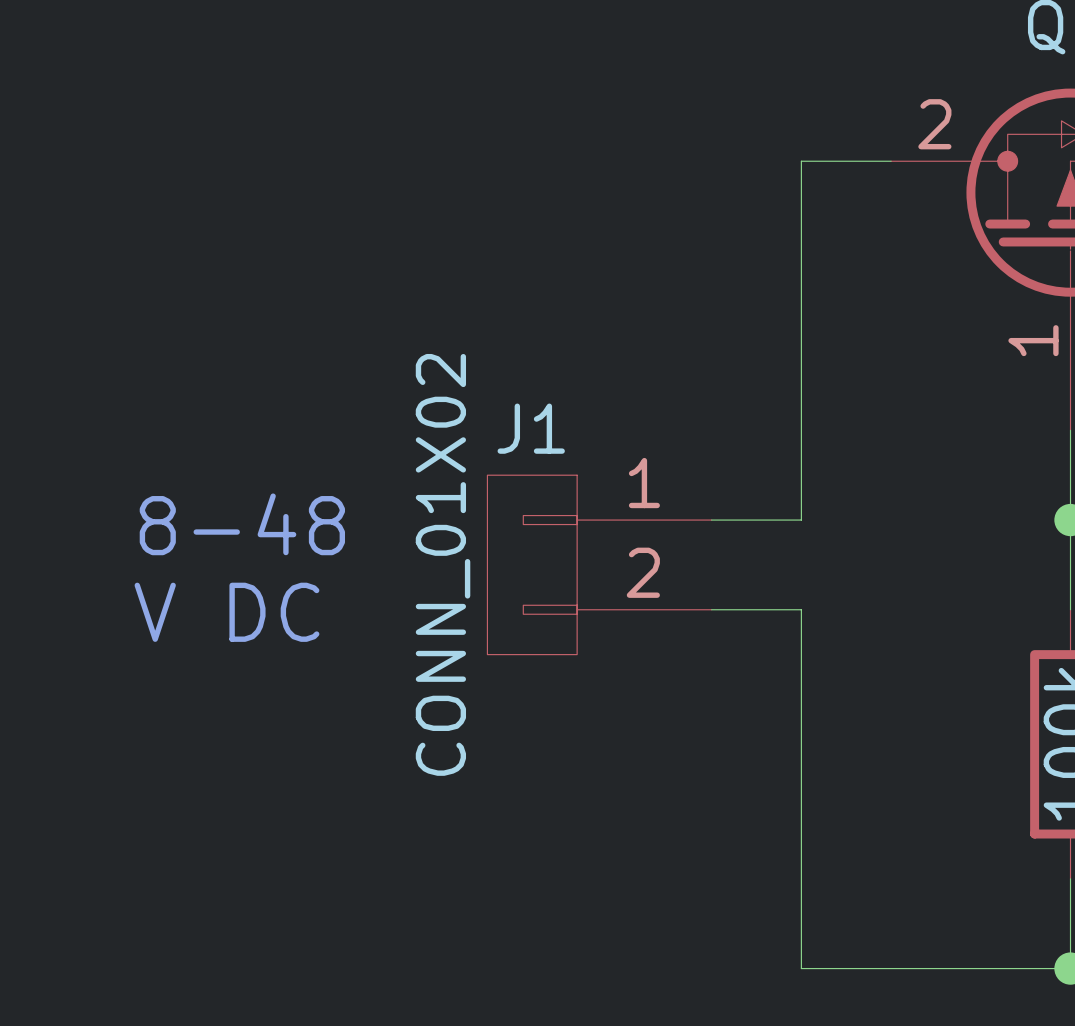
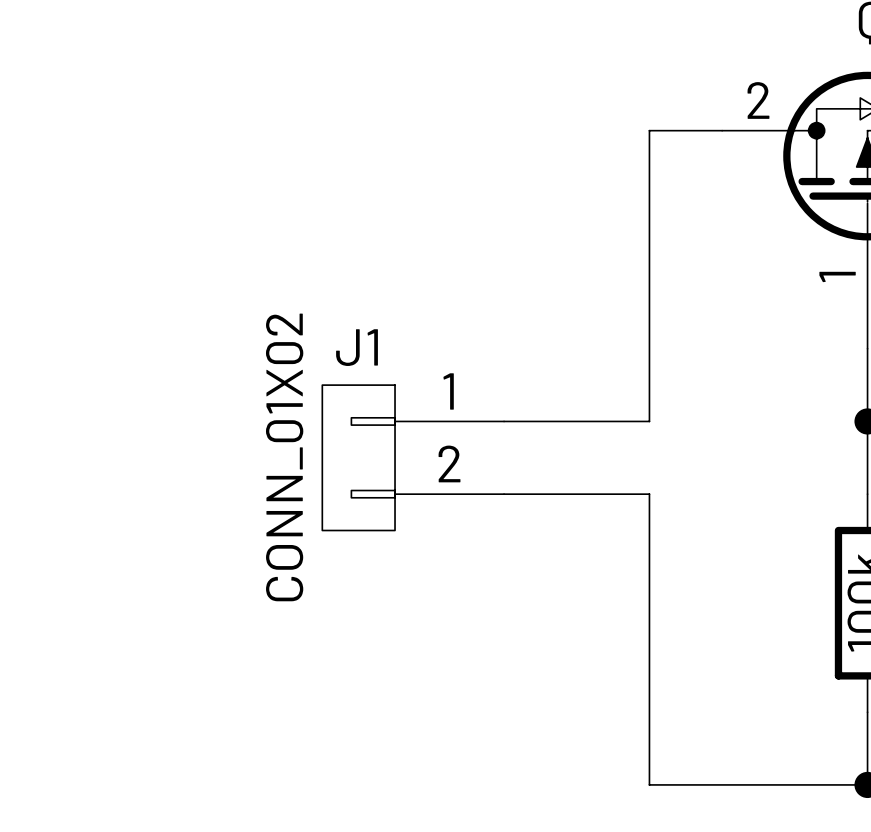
text: 8-48 (242, 524) -> none
J1 position: (599, 564) -> (413, 457)
text: V DC (226, 612) -> none

